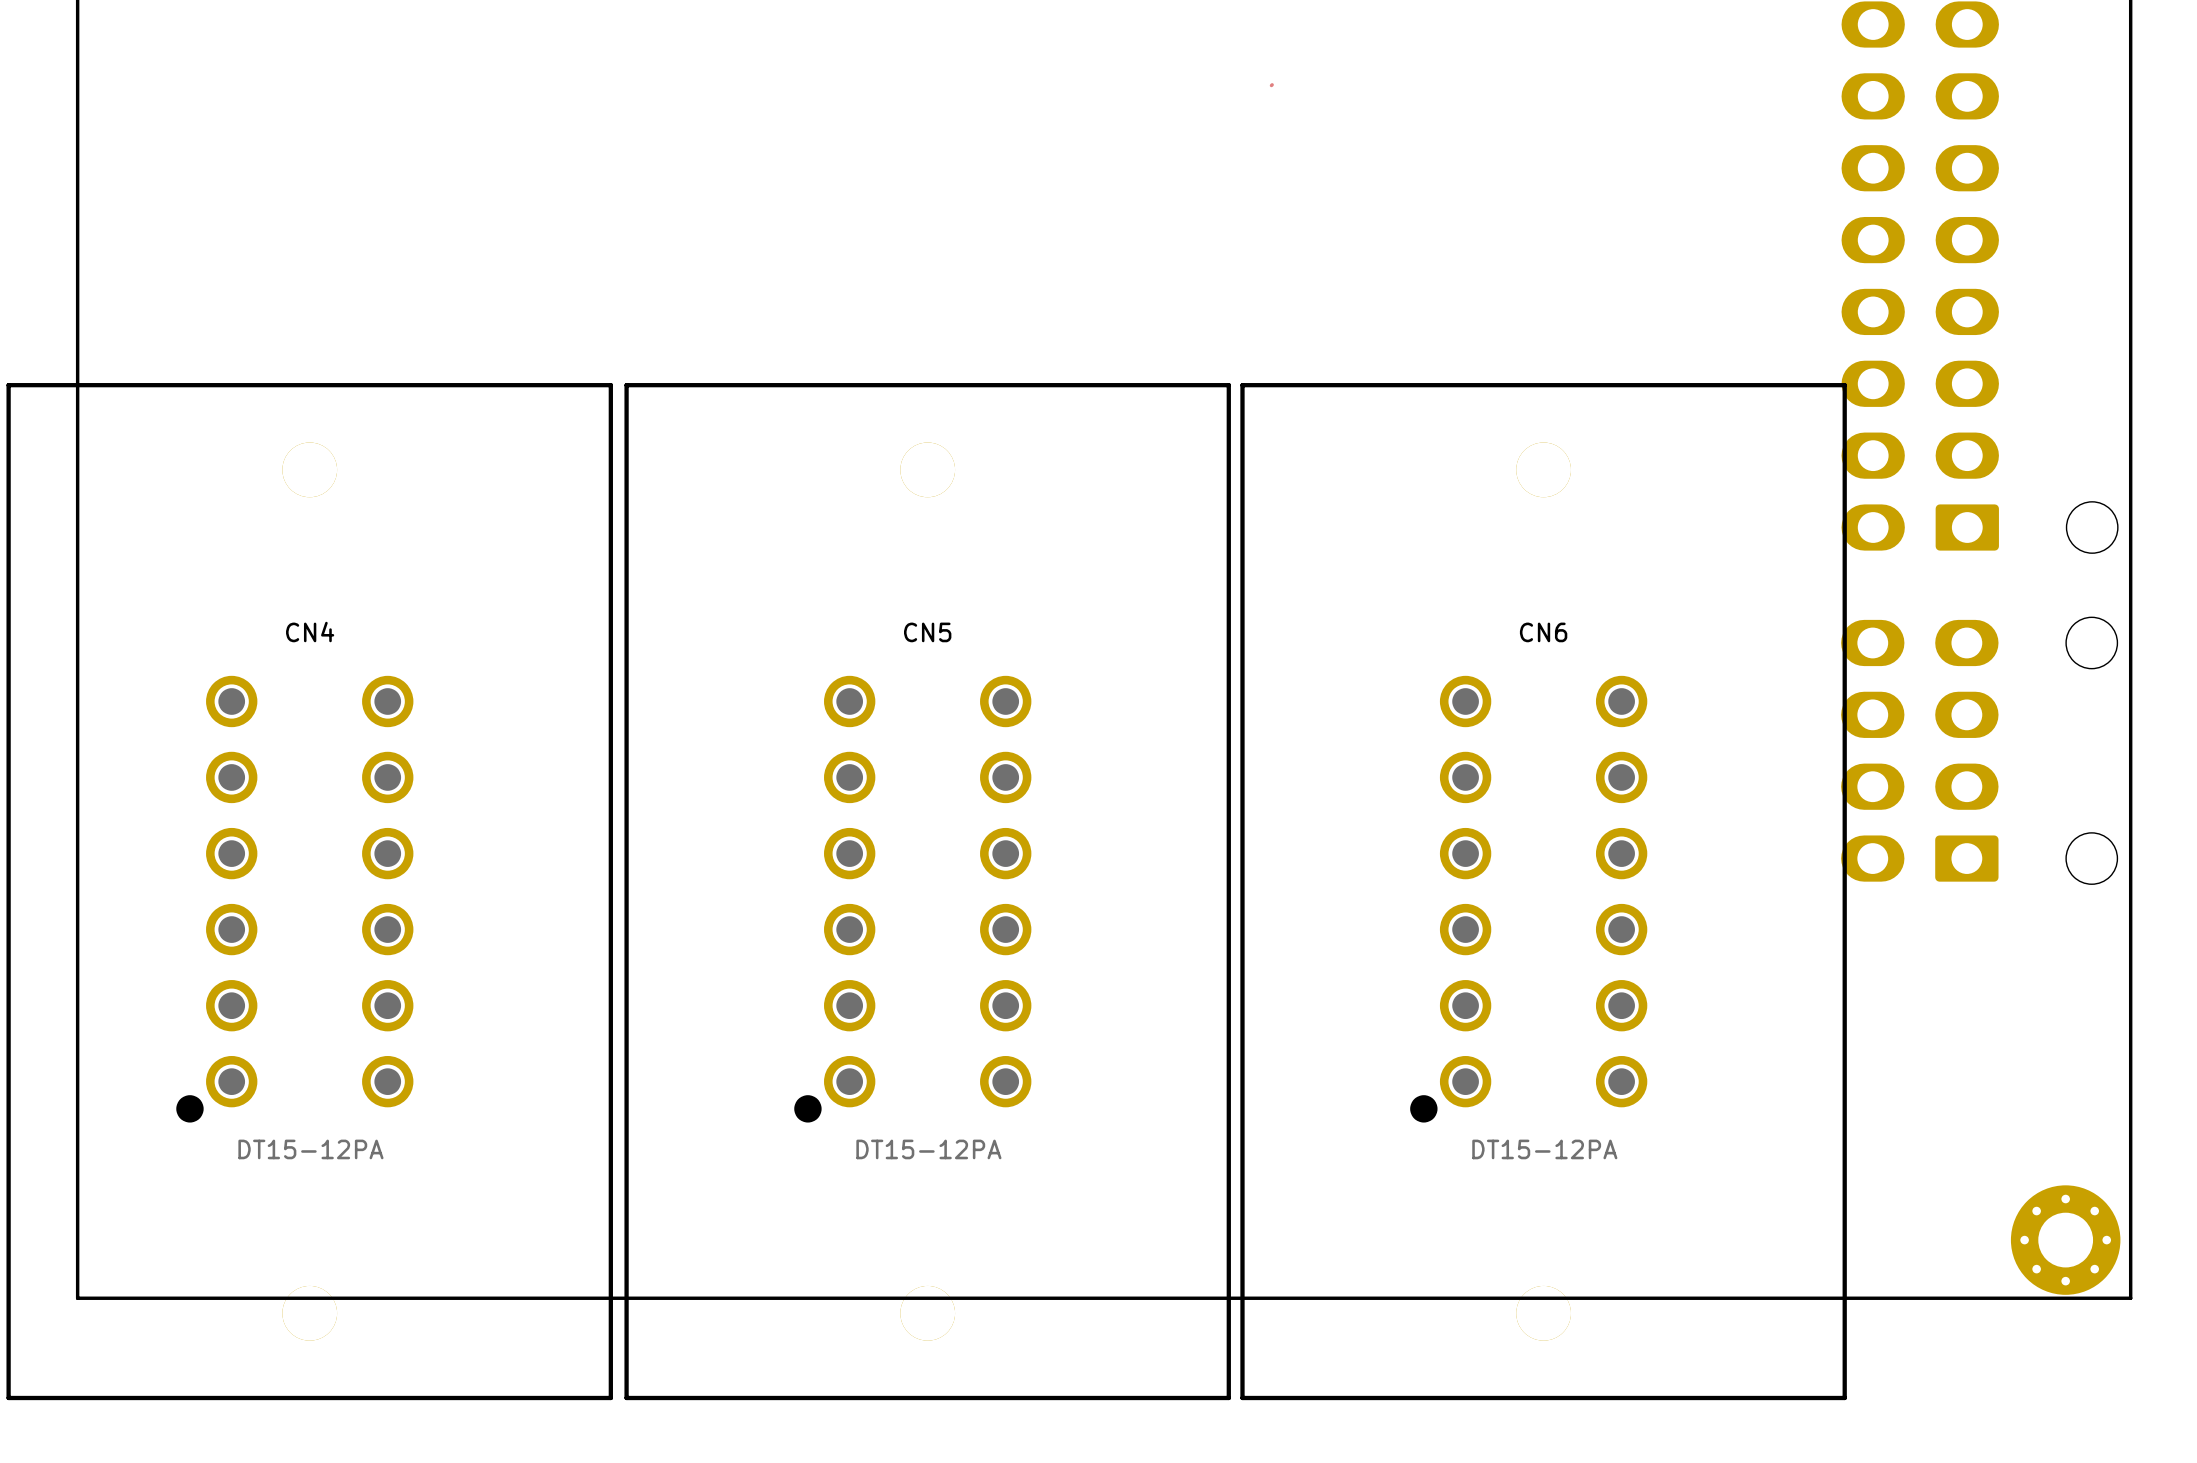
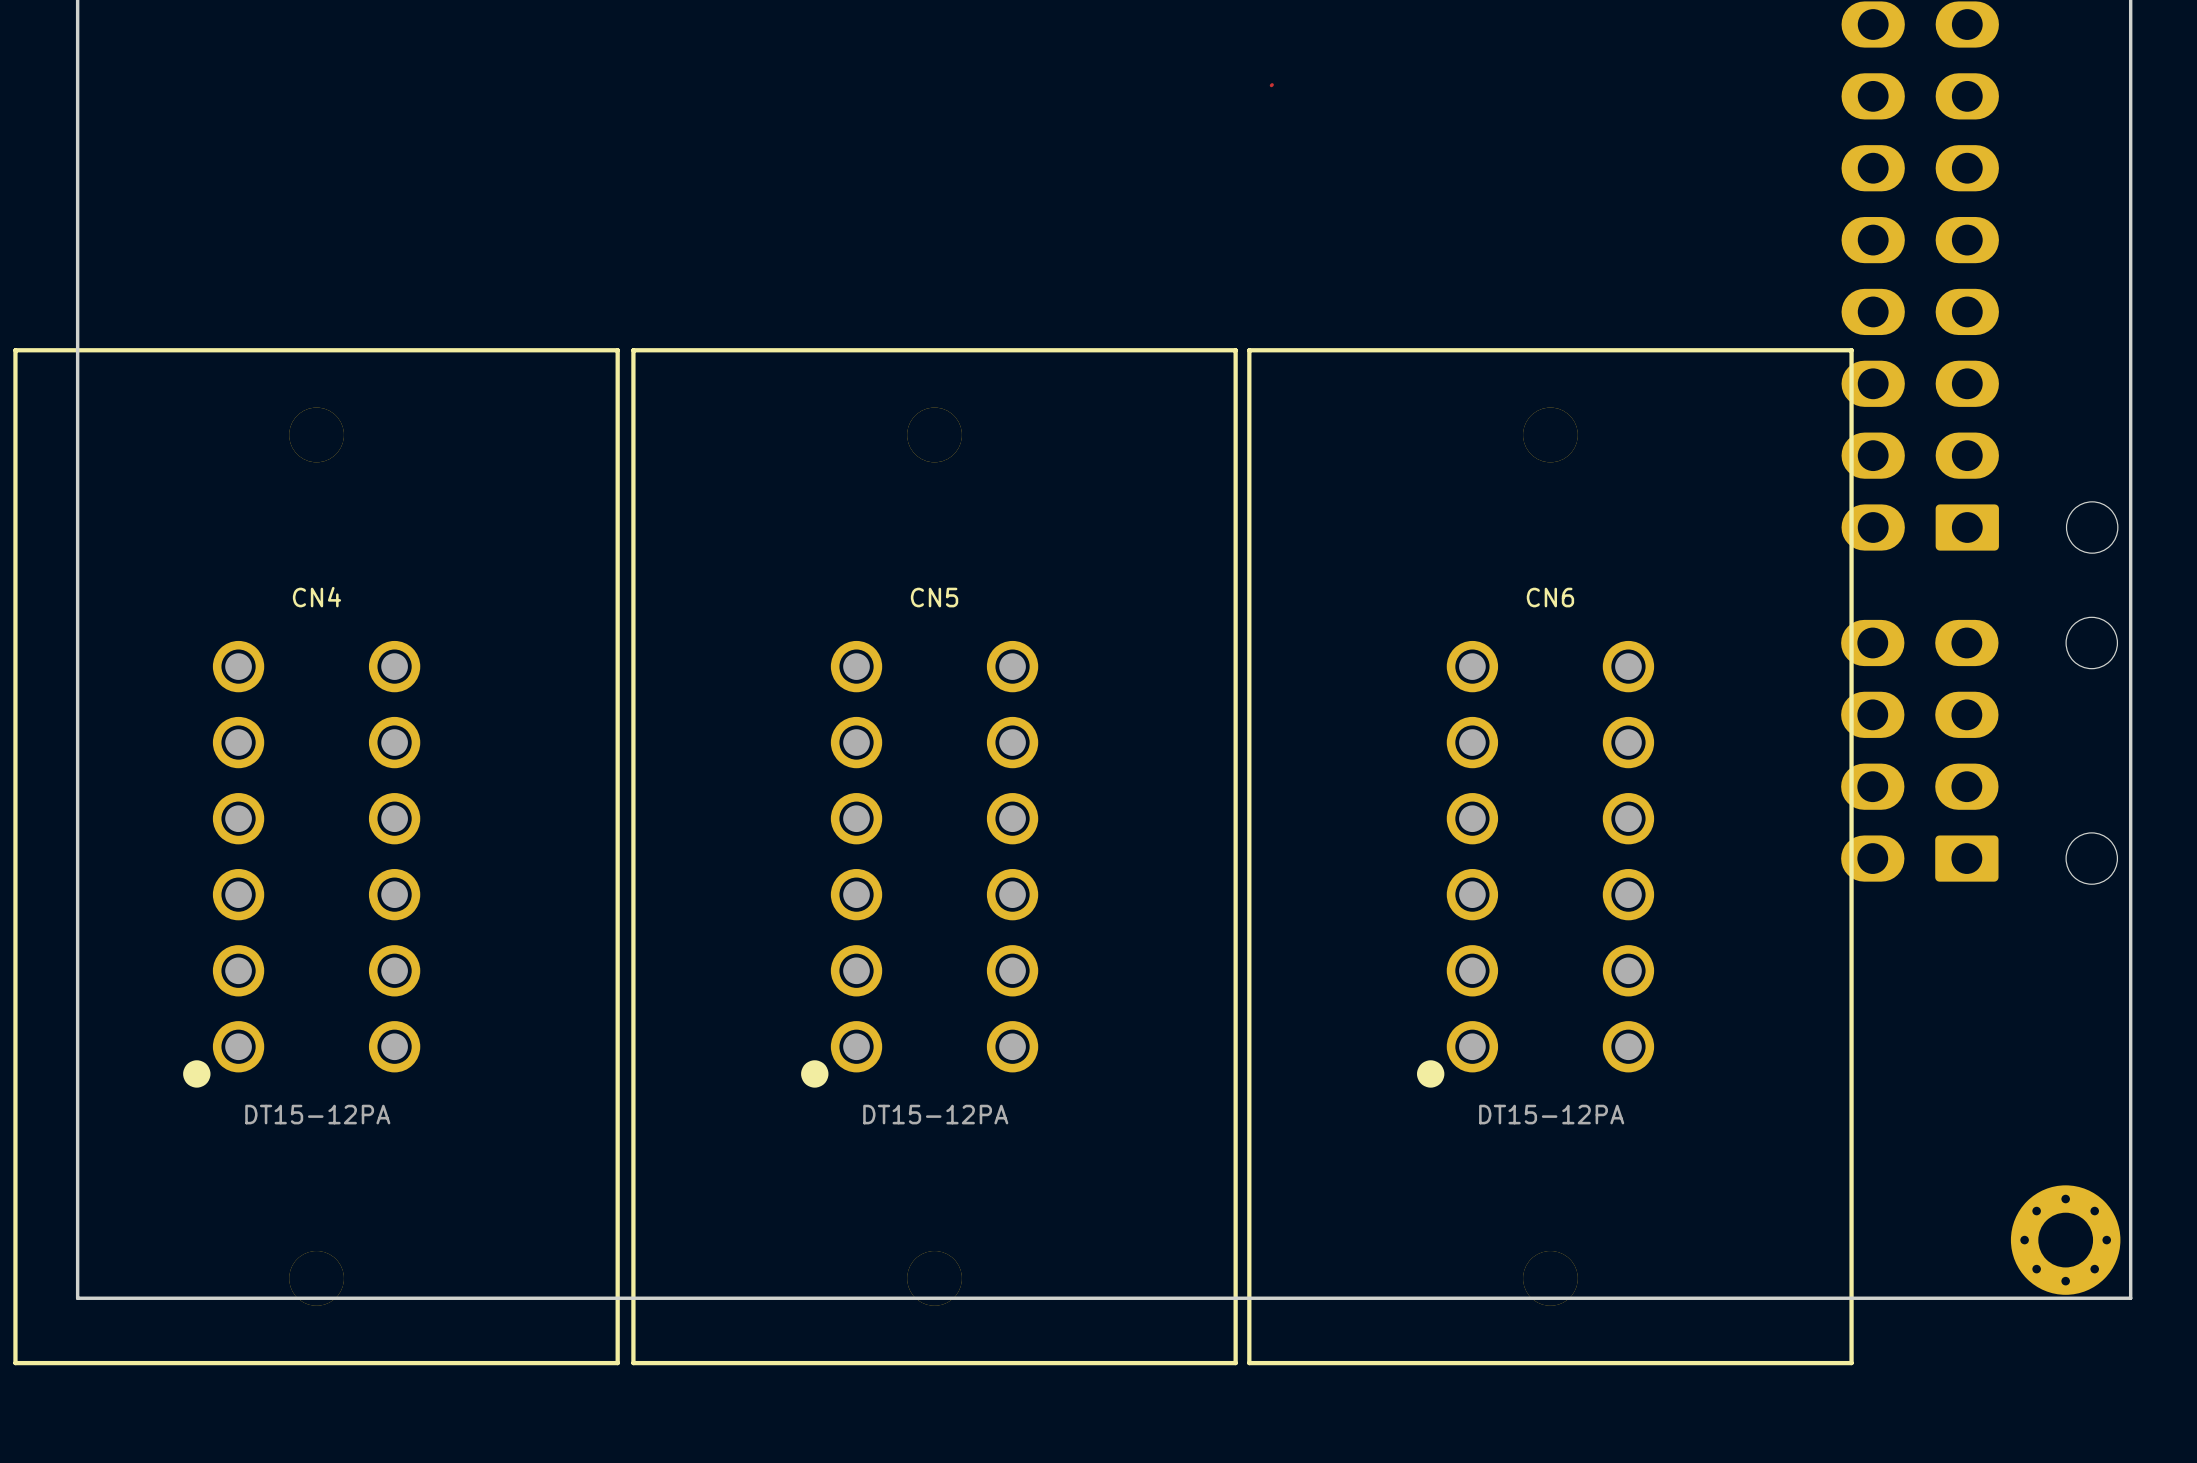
CN4 position: (309, 891) -> (316, 856)
CN5 position: (927, 891) -> (934, 856)
CN6 position: (1543, 891) -> (1550, 856)

